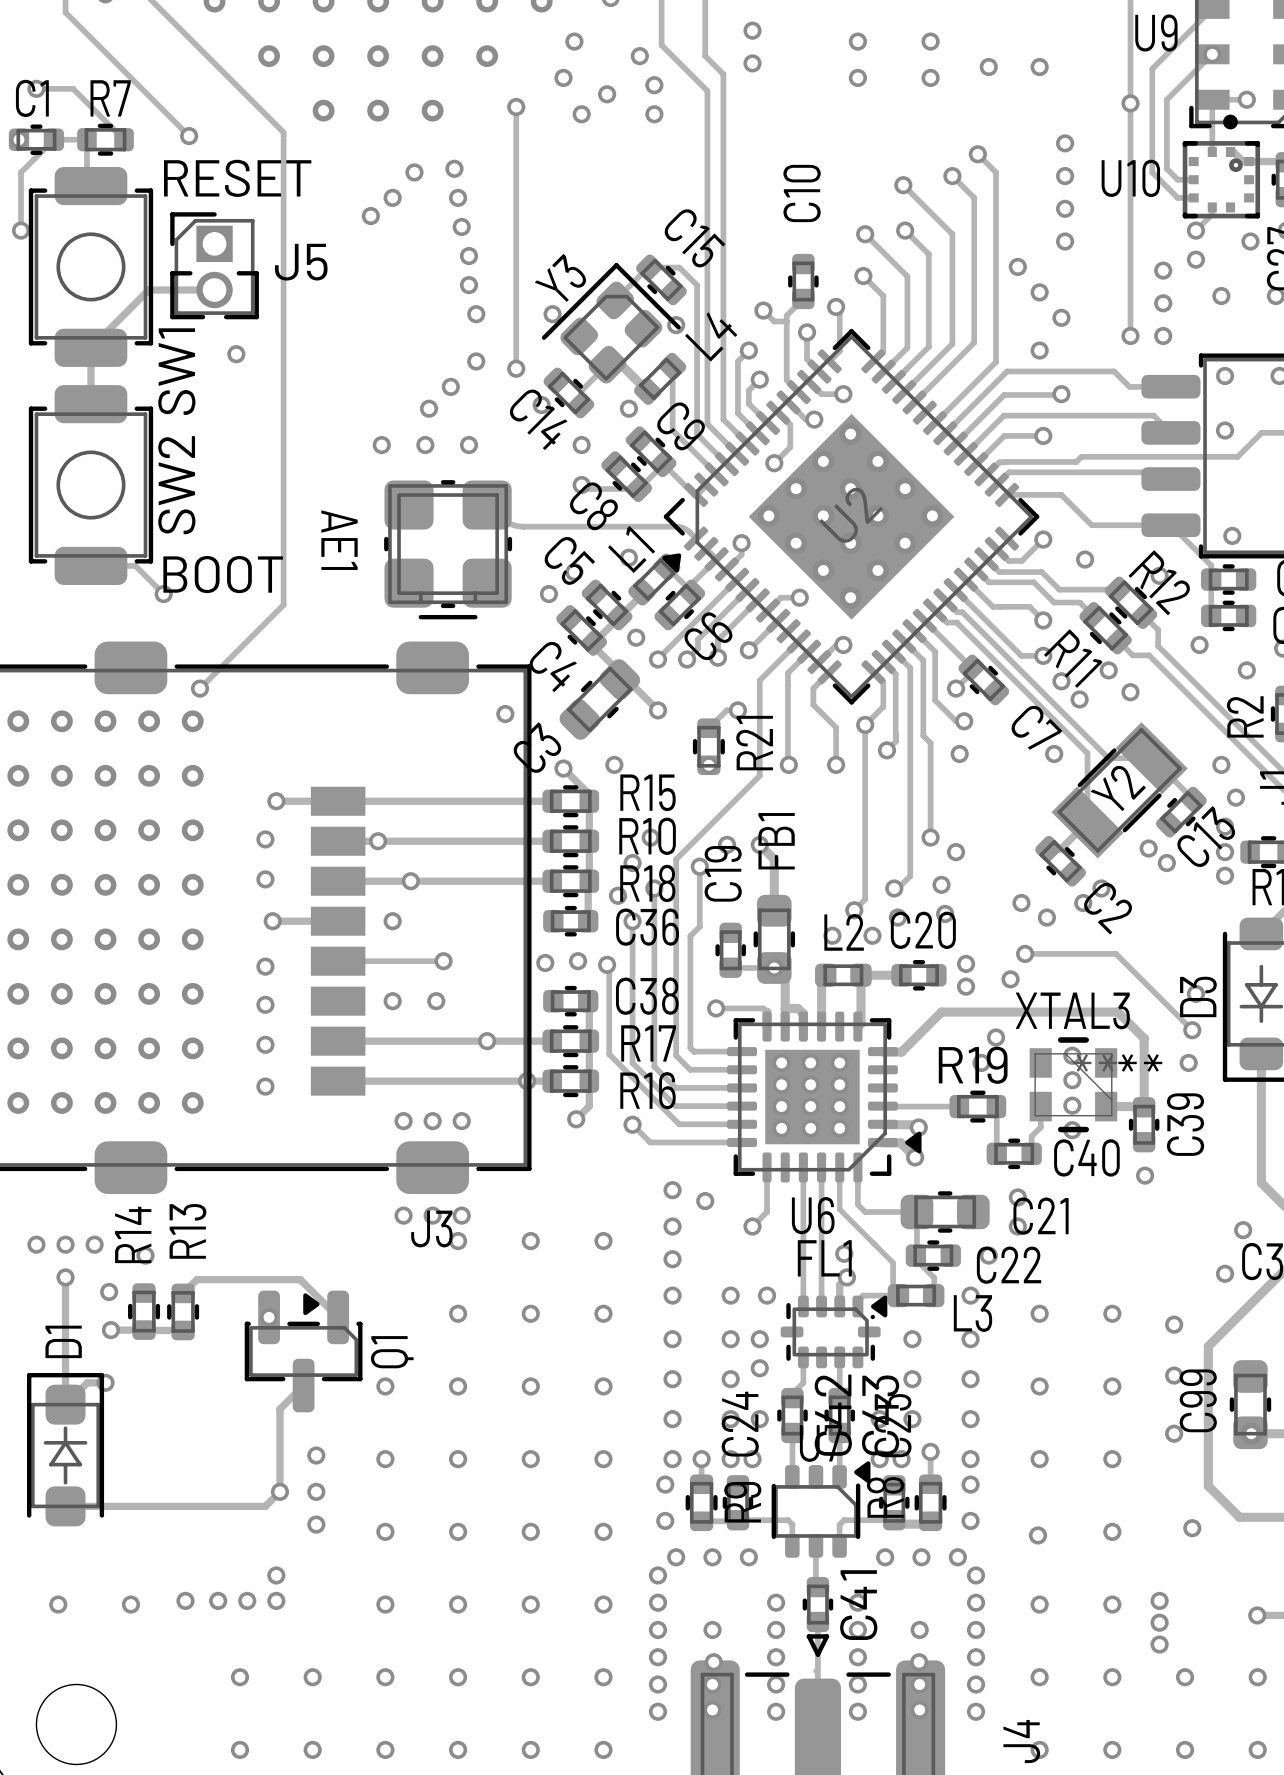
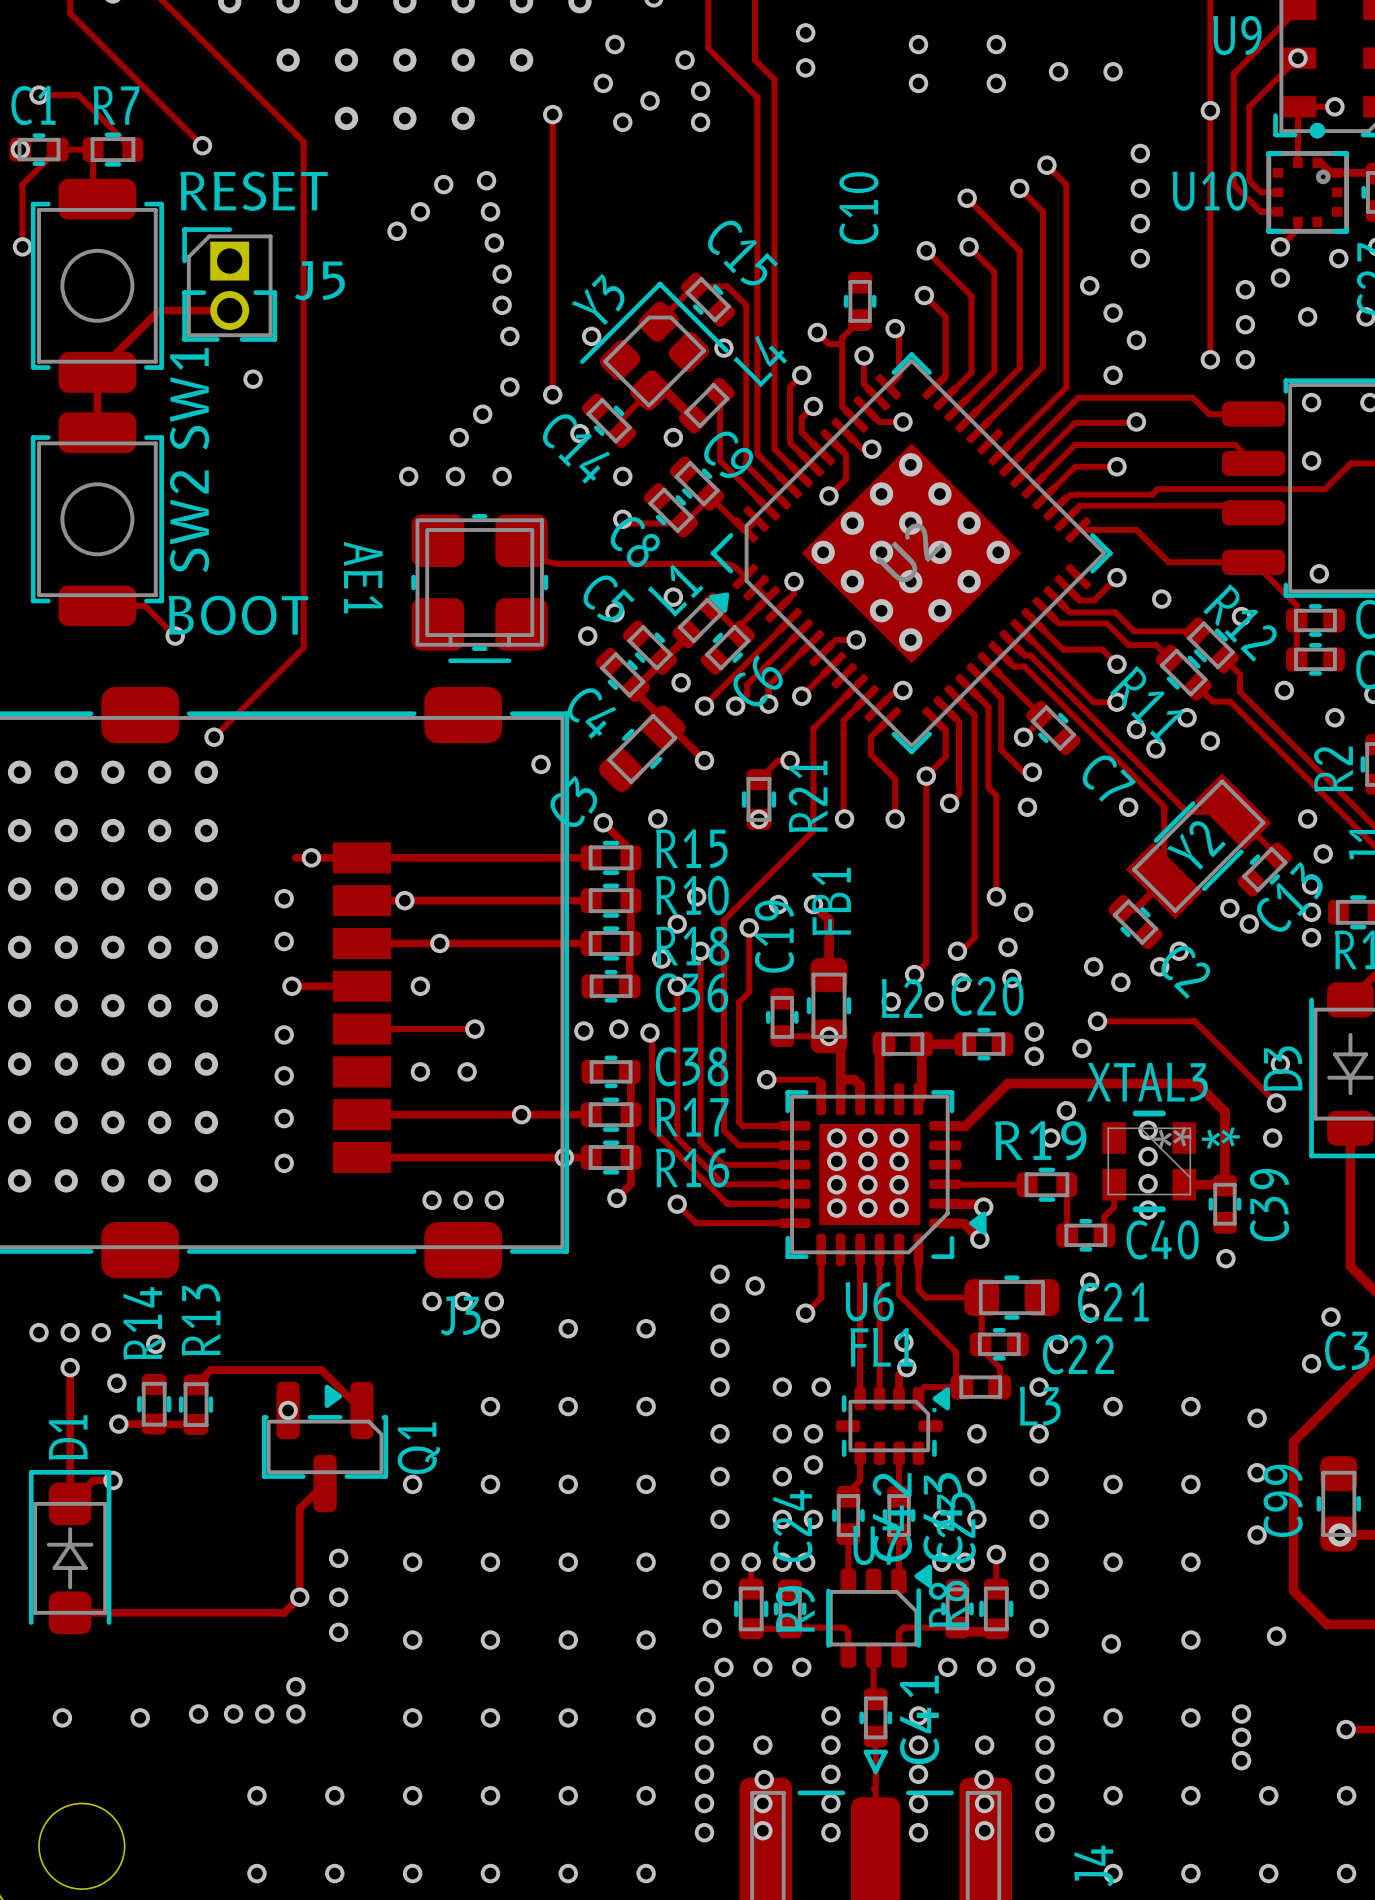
via position: (276, 801) -> (311, 857)

